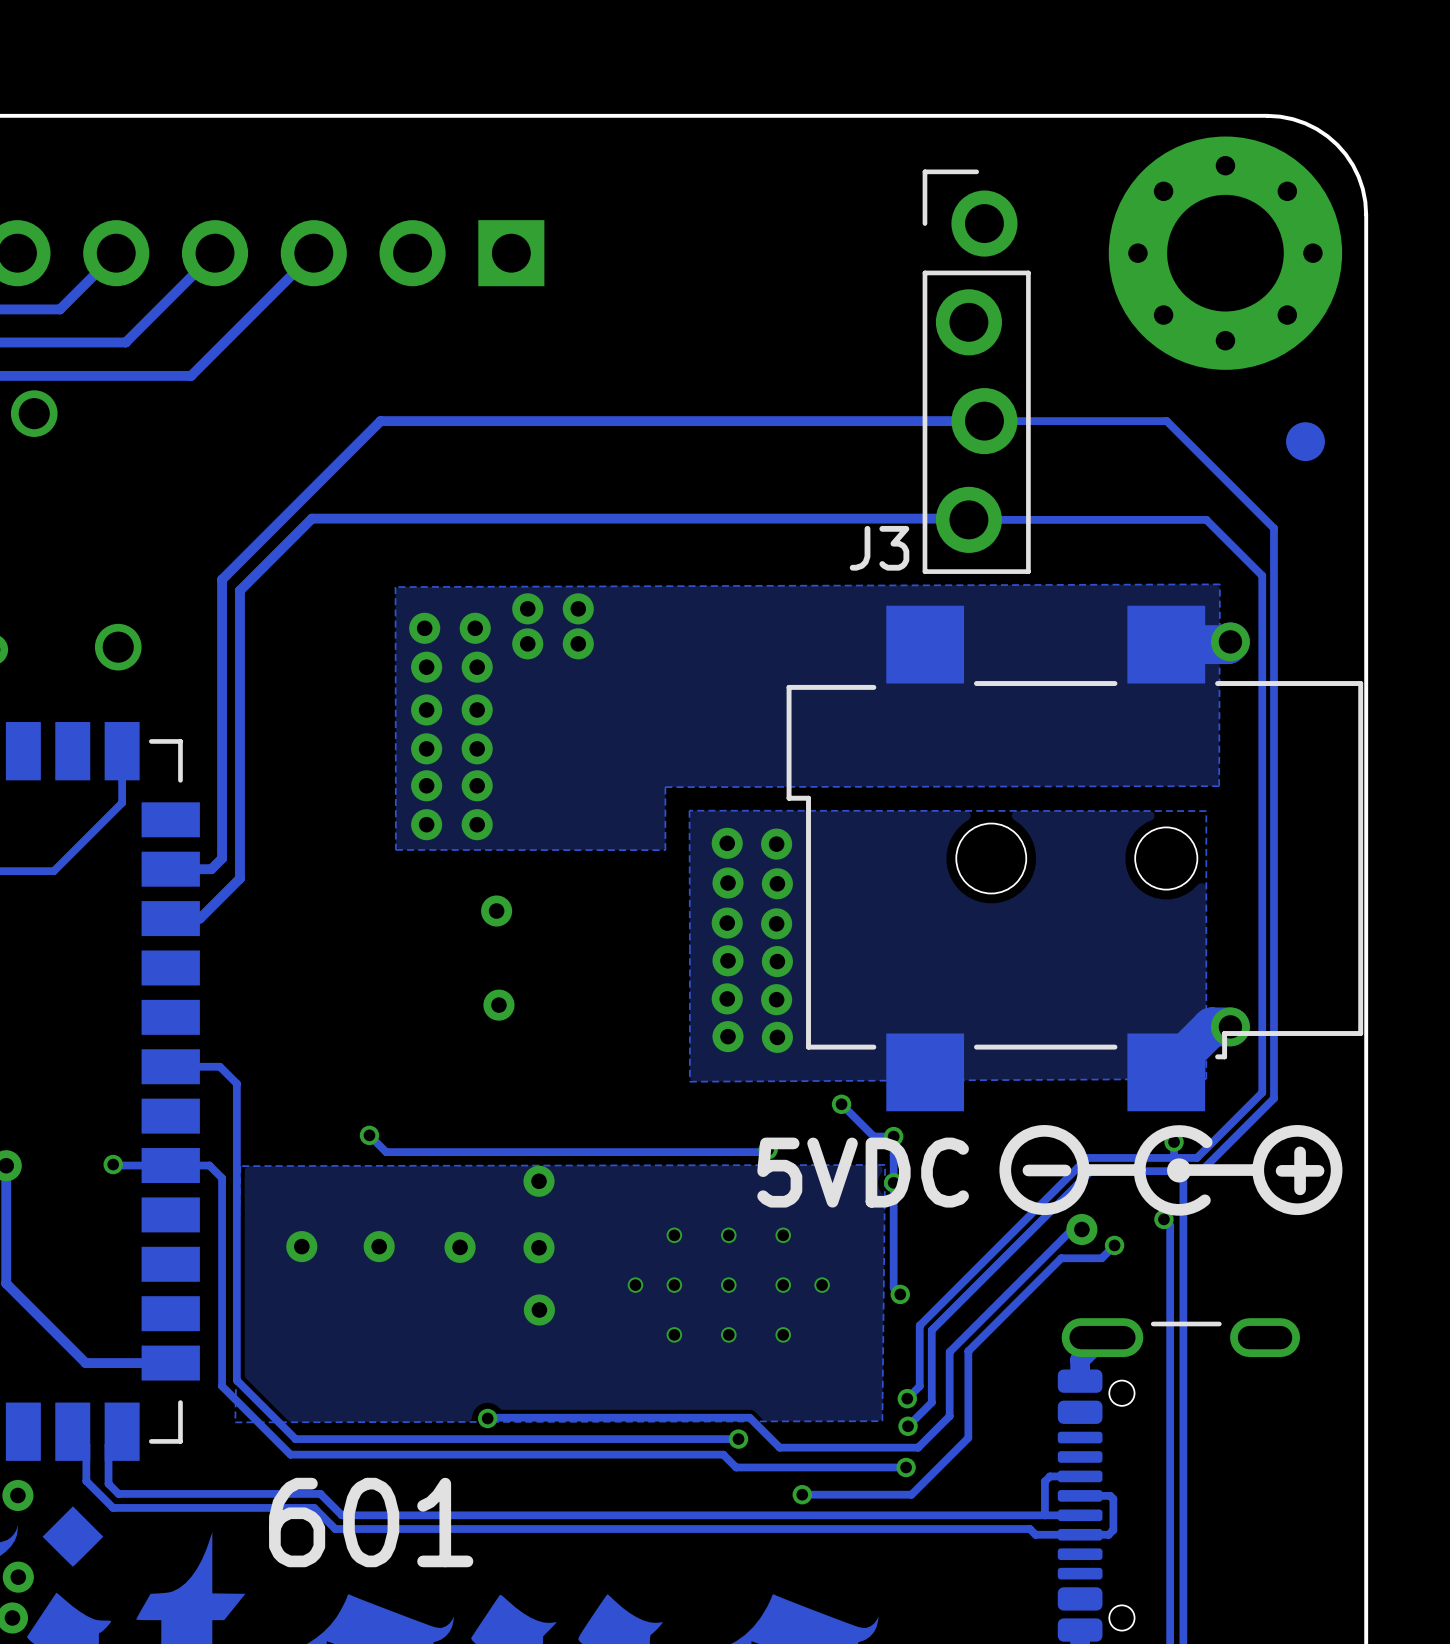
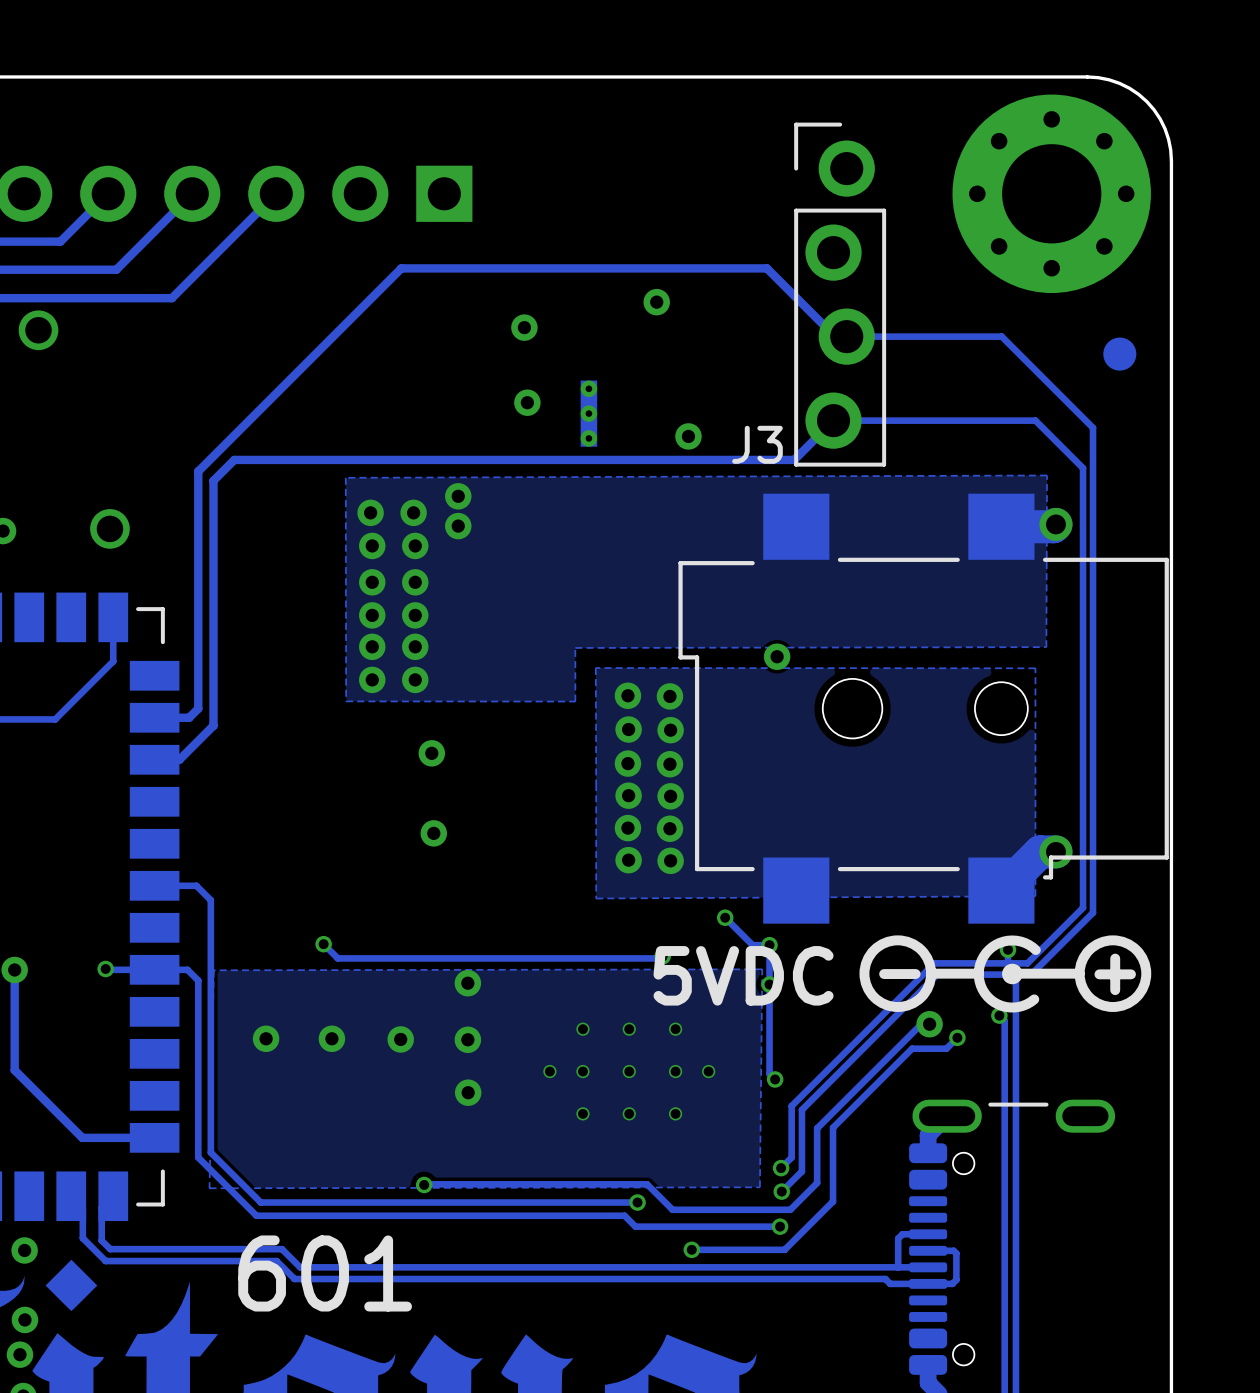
via: none -> (656, 302)
via: none -> (524, 327)
track: (970, 421) (380, 421) -> (835, 336) (766, 268) (401, 268) (333, 336)
via: none -> (527, 402)
part: none -> (588, 413)
track: (982, 519) (311, 518) (264, 566) -> (845, 420) (833, 420) (794, 459) (234, 459)
via: none -> (688, 436)
via: (578, 608) -> none
via: (578, 643) -> none
via: none -> (777, 656)

